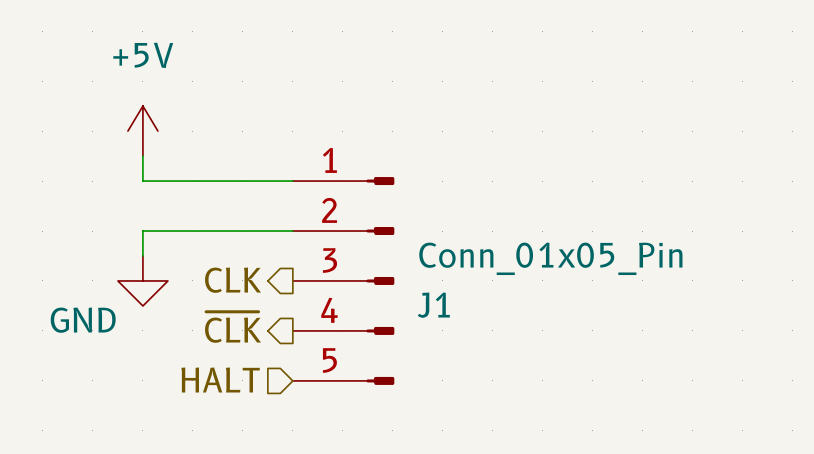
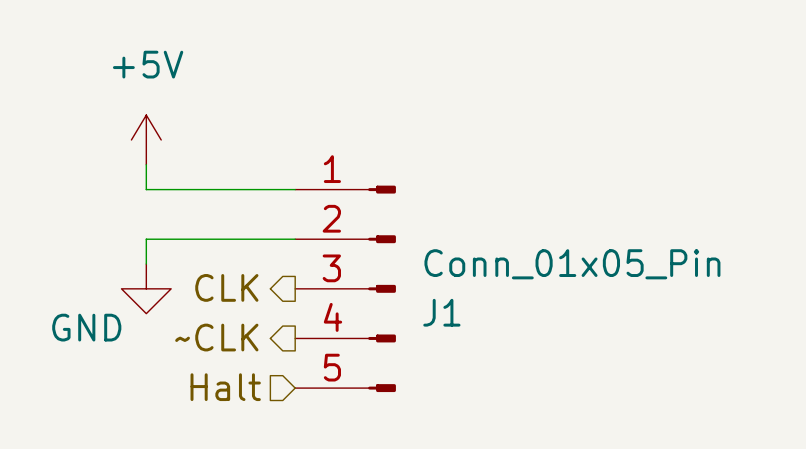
hierarchical label: ~{CLK} (233, 327) -> ~CLK (216, 337)
hierarchical label: HALT (220, 380) -> Halt (225, 387)

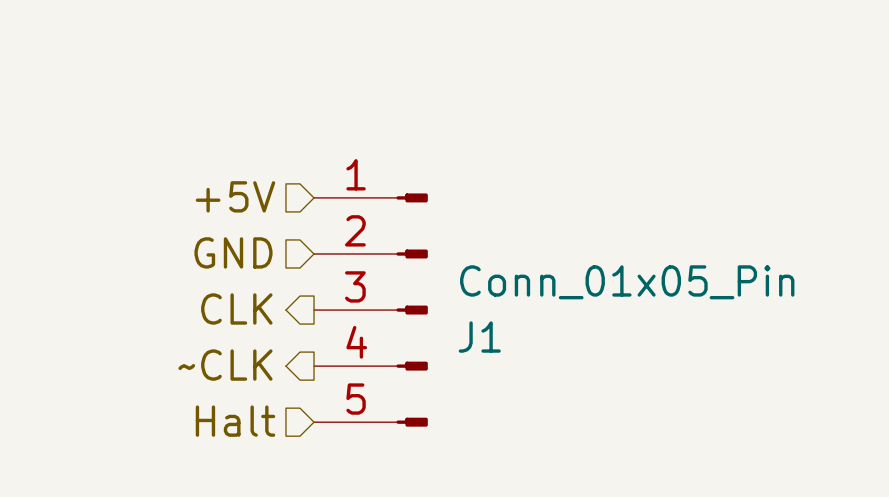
power symbol: +5V (146, 139) -> none
wire: (146, 164) (146, 189) (295, 189) -> none
hierarchical label: none -> +5V (235, 196)
hierarchical label: none -> GND (233, 252)
wire: (295, 239) (146, 239) (146, 264) -> none
power symbol: GND (146, 288) -> none

